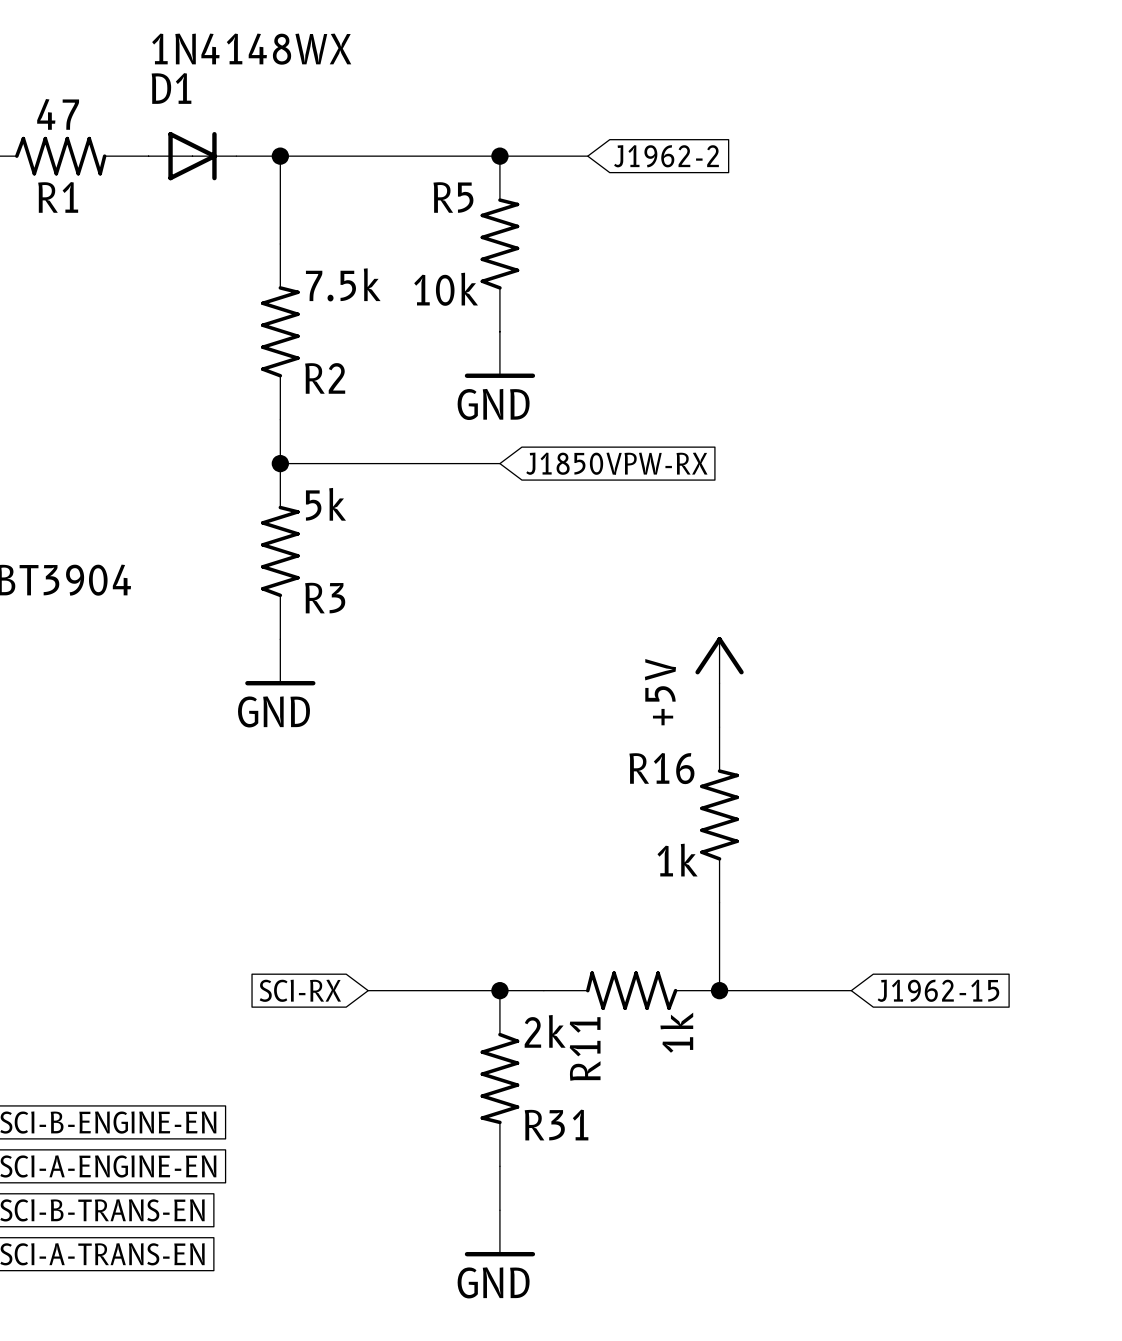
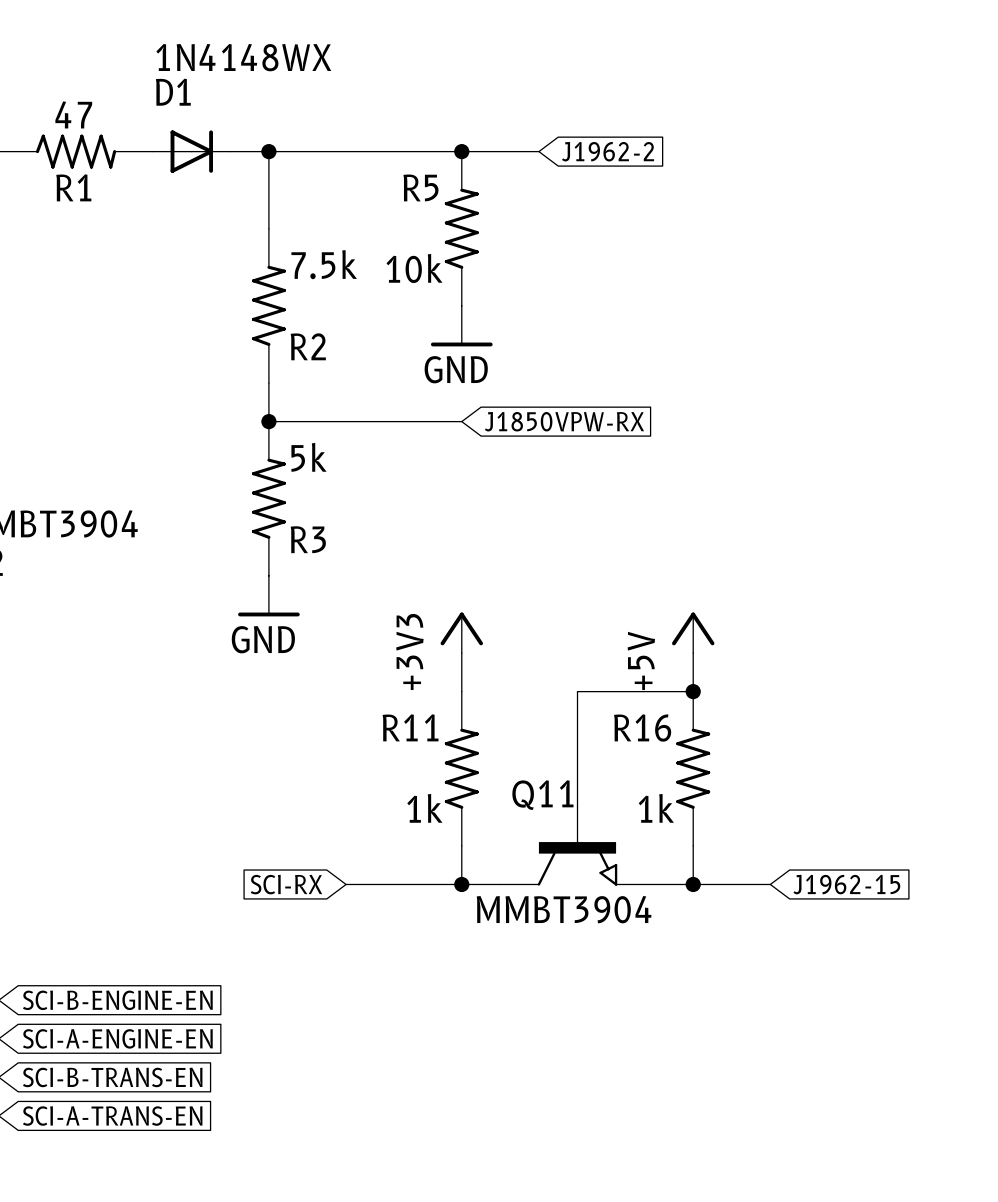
power symbol position: +5V (719, 660) -> +5V (693, 632)
wire: (719, 683) (719, 727) -> (461, 653) (461, 691)
power symbol: none -> +3V3 (461, 632)
wire: none -> (693, 653) (693, 691) (577, 691) (577, 807)
junction: none -> (693, 691)
R16 position: (719, 814) -> (693, 768)
wire: (719, 902) (719, 990) -> none
wire: none -> (693, 845) (693, 884)
Q11: none -> MMBT3904 (577, 846)
R11 rotation: 0° (631, 990) -> 90° clockwise (461, 768)
R11 position: (631, 990) -> (461, 768)
junction position: (719, 990) -> (693, 884)
R31: 2k (499, 1078) -> none
wire: (499, 1166) (499, 1210) -> (461, 845) (461, 884)
power symbol: GND (499, 1233) -> none

